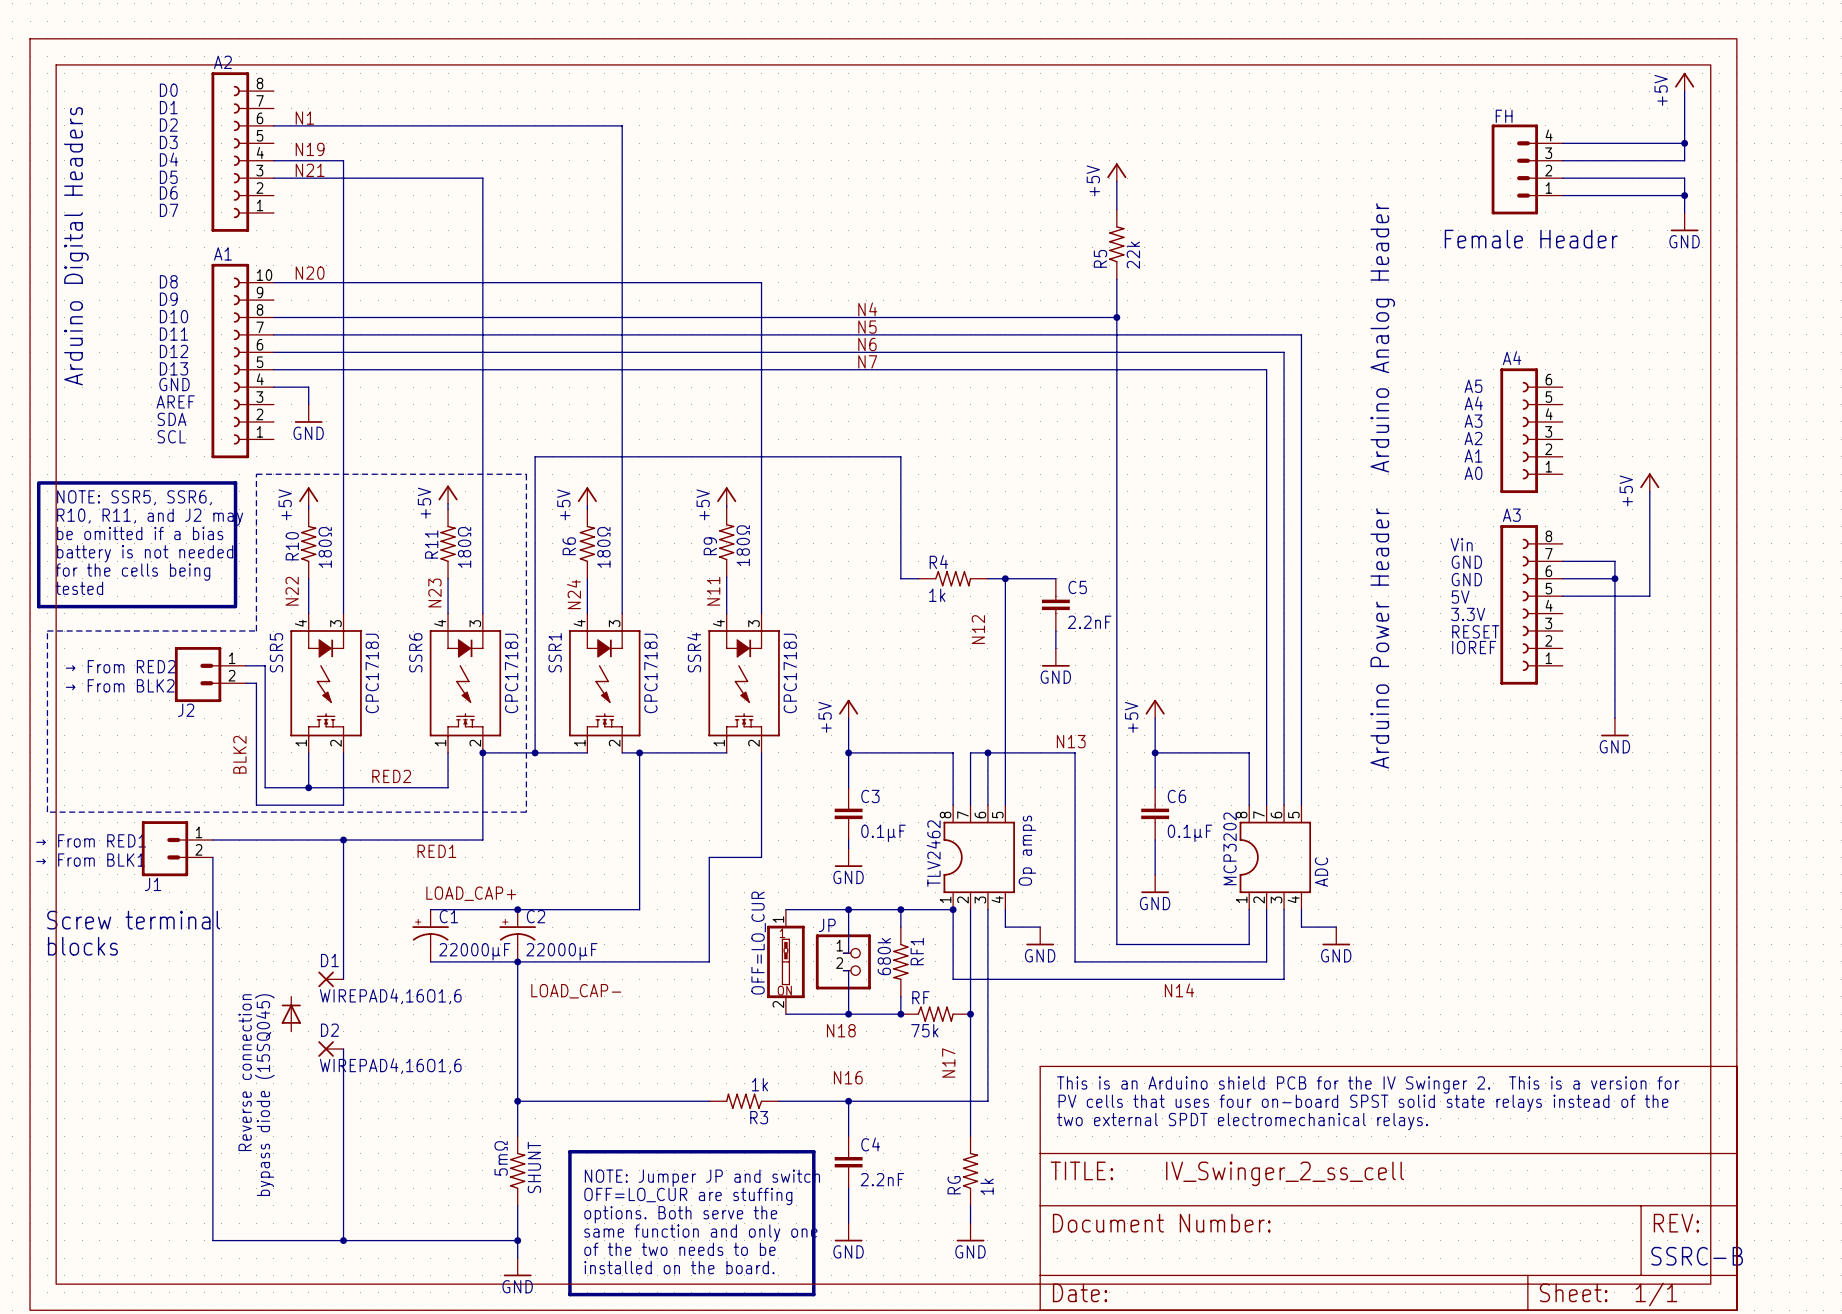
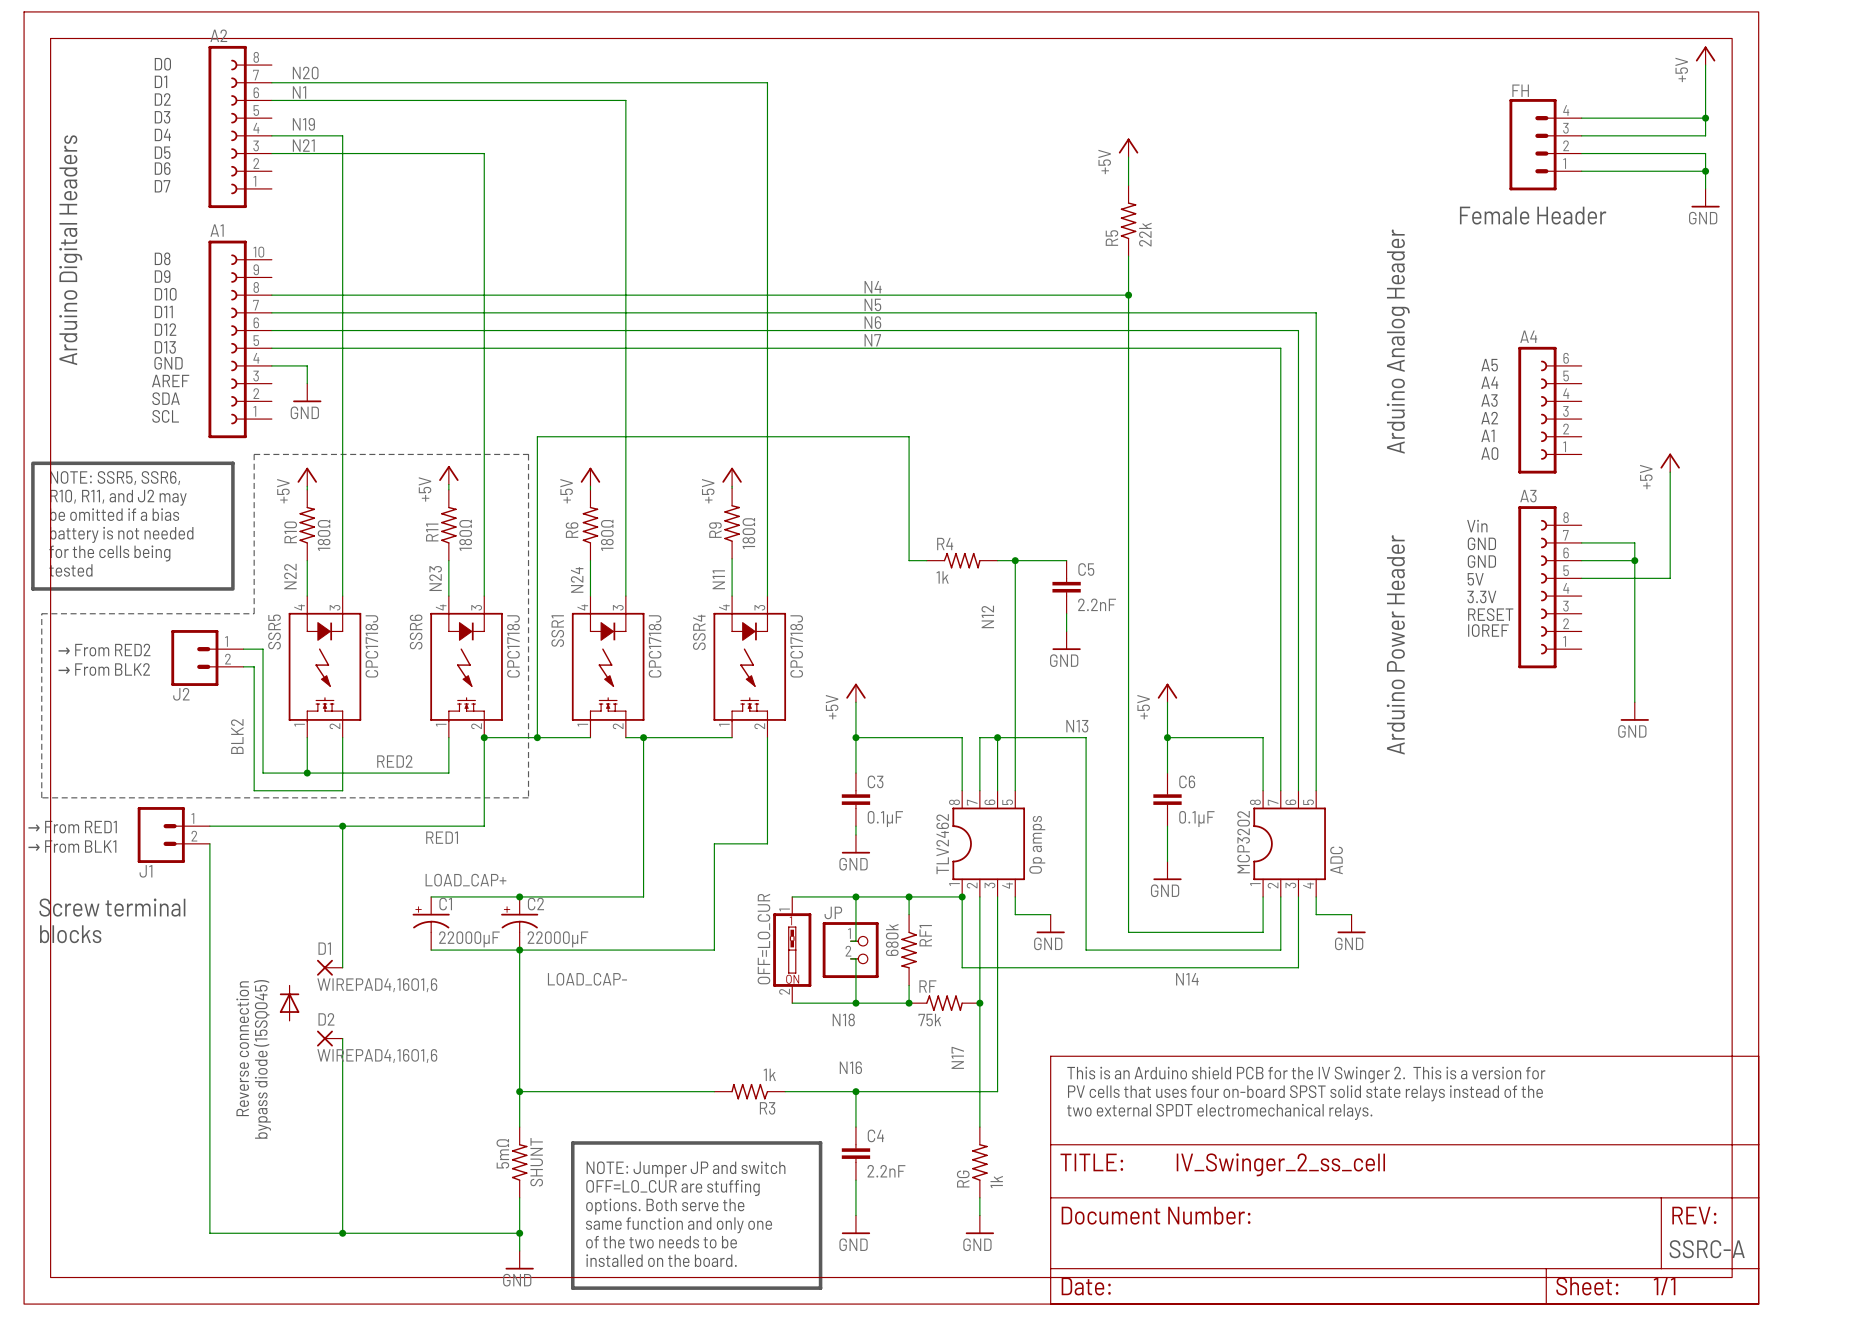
label: none -> N20 (305, 73)
label: N20 (310, 273) -> none
wire: (273, 282) (761, 282) -> (271, 82) (767, 82) (767, 259)
text: SSRC-B (1697, 1256) -> SSRC-A (1707, 1249)

